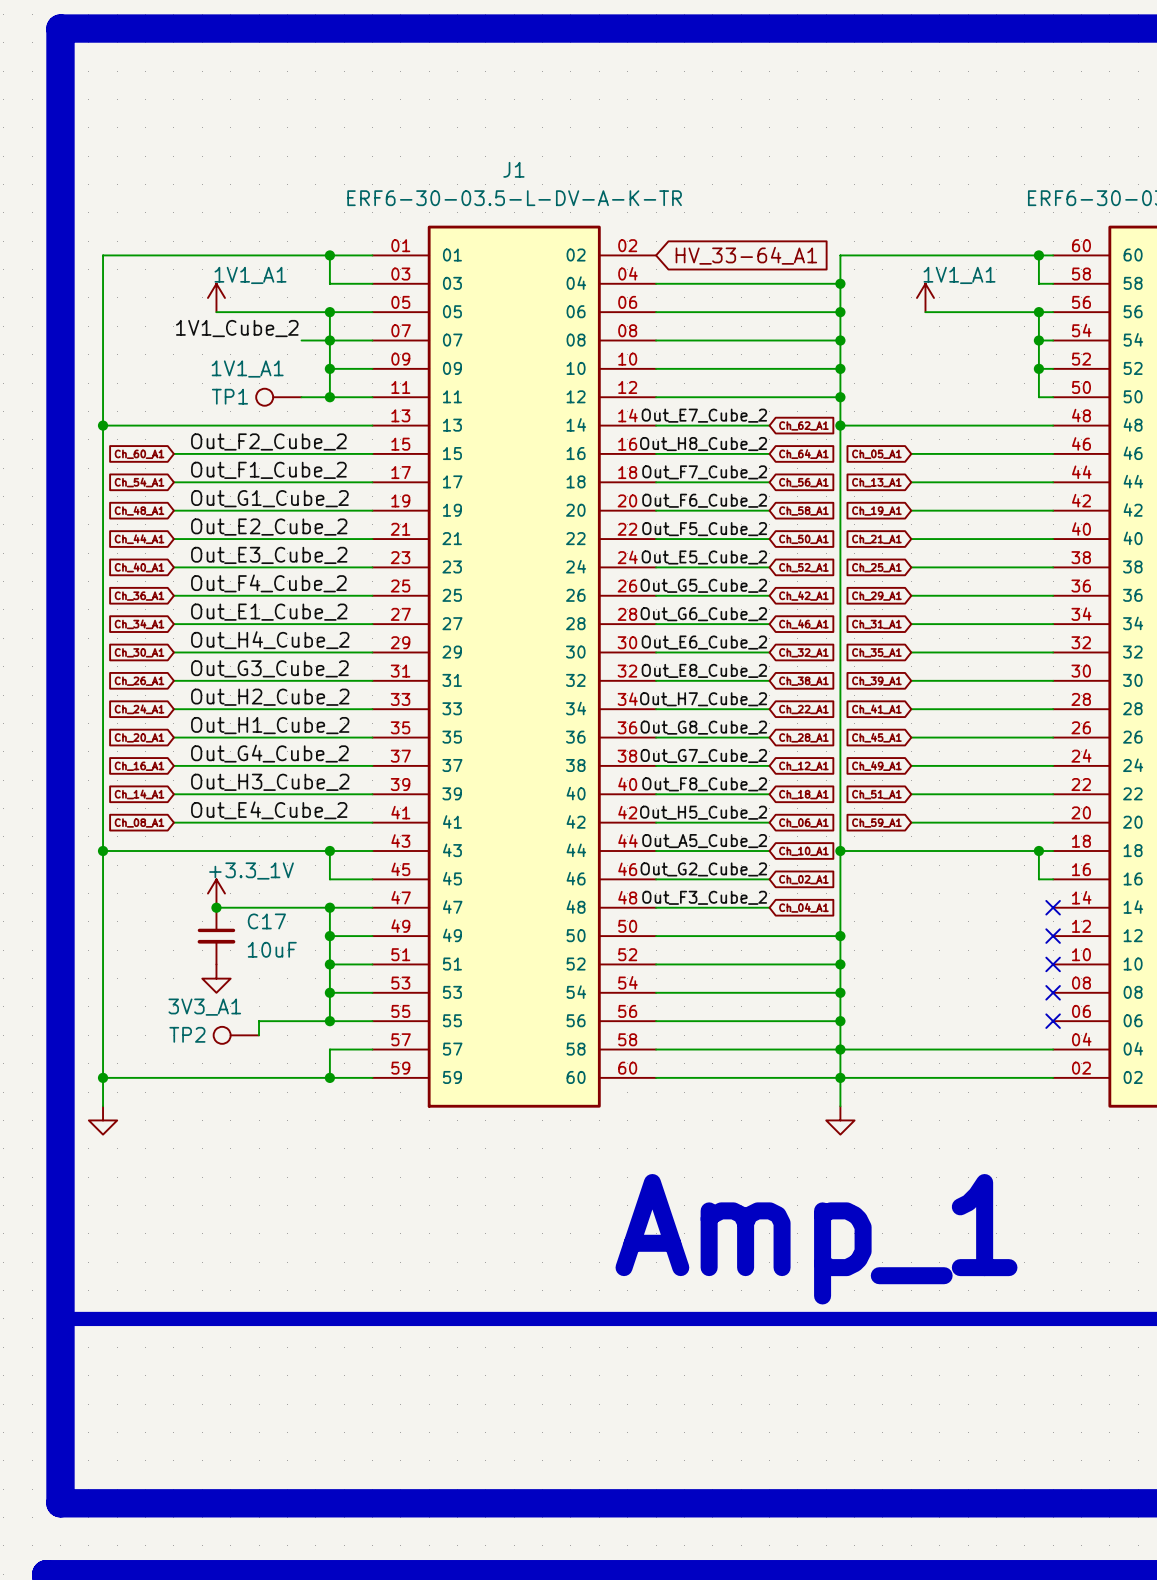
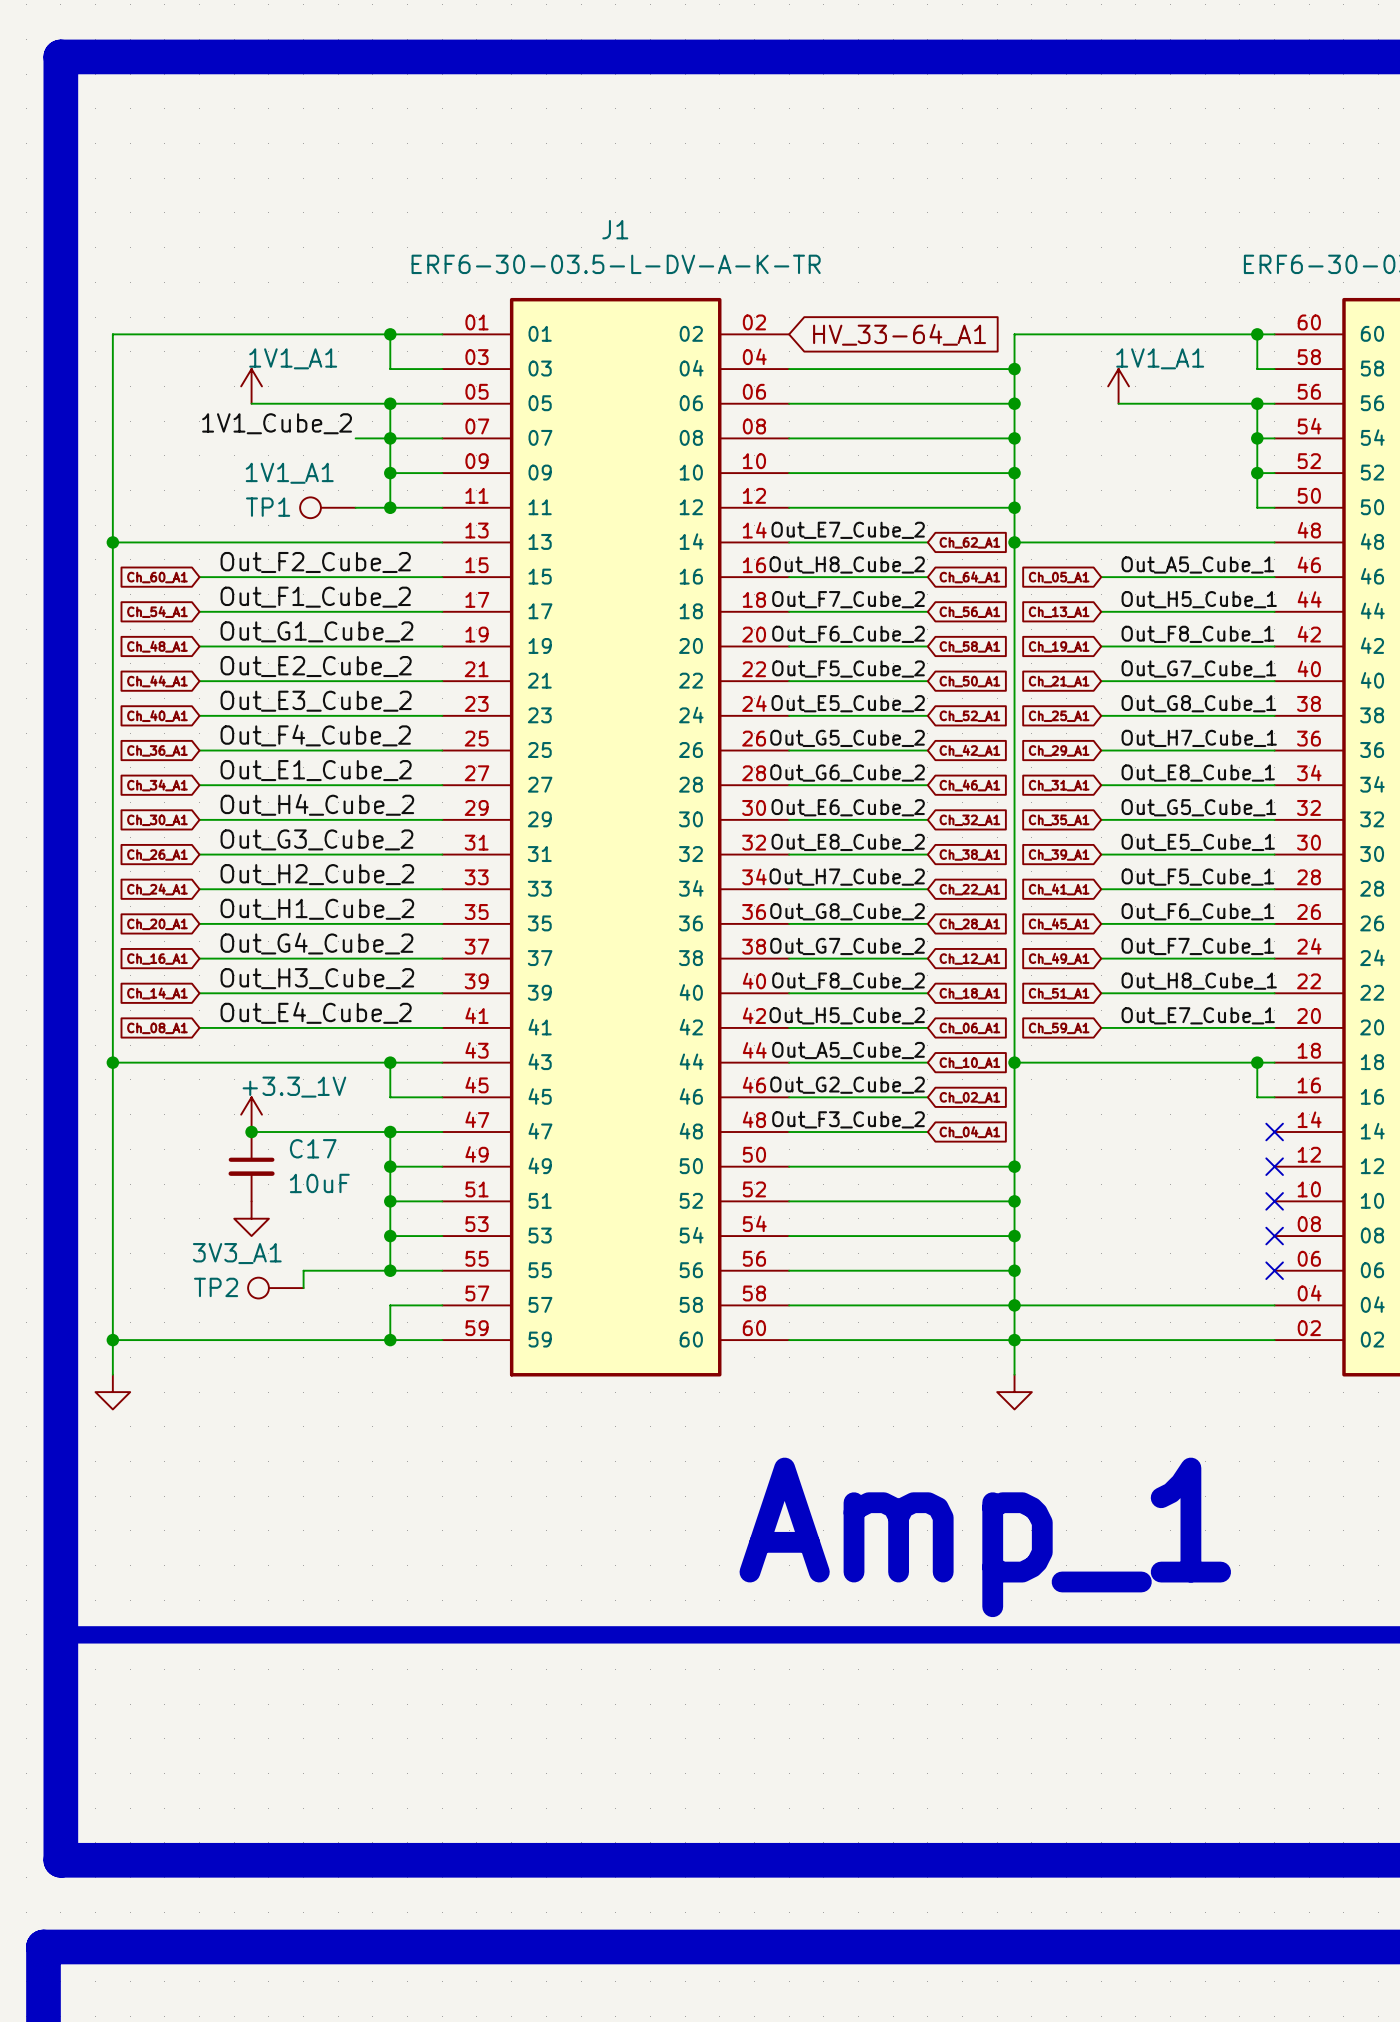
label: none -> Out_A5_Cube_1 (1197, 564)
label: none -> Out_H5_Cube_1 (1199, 599)
label: none -> Out_F8_Cube_1 (1197, 634)
label: none -> Out_G7_Cube_1 (1198, 669)
label: none -> Out_G8_Cube_1 (1198, 703)
label: none -> Out_H7_Cube_1 (1199, 738)
label: none -> Out_E8_Cube_1 (1198, 773)
label: none -> Out_G5_Cube_1 (1198, 807)
label: none -> Out_E5_Cube_1 (1198, 842)
label: none -> Out_F5_Cube_1 (1197, 877)
label: none -> Out_F6_Cube_1 (1197, 911)
label: none -> Out_F7_Cube_1 (1197, 946)
label: none -> Out_H8_Cube_1 (1199, 981)
label: none -> Out_E7_Cube_1 (1198, 1015)

